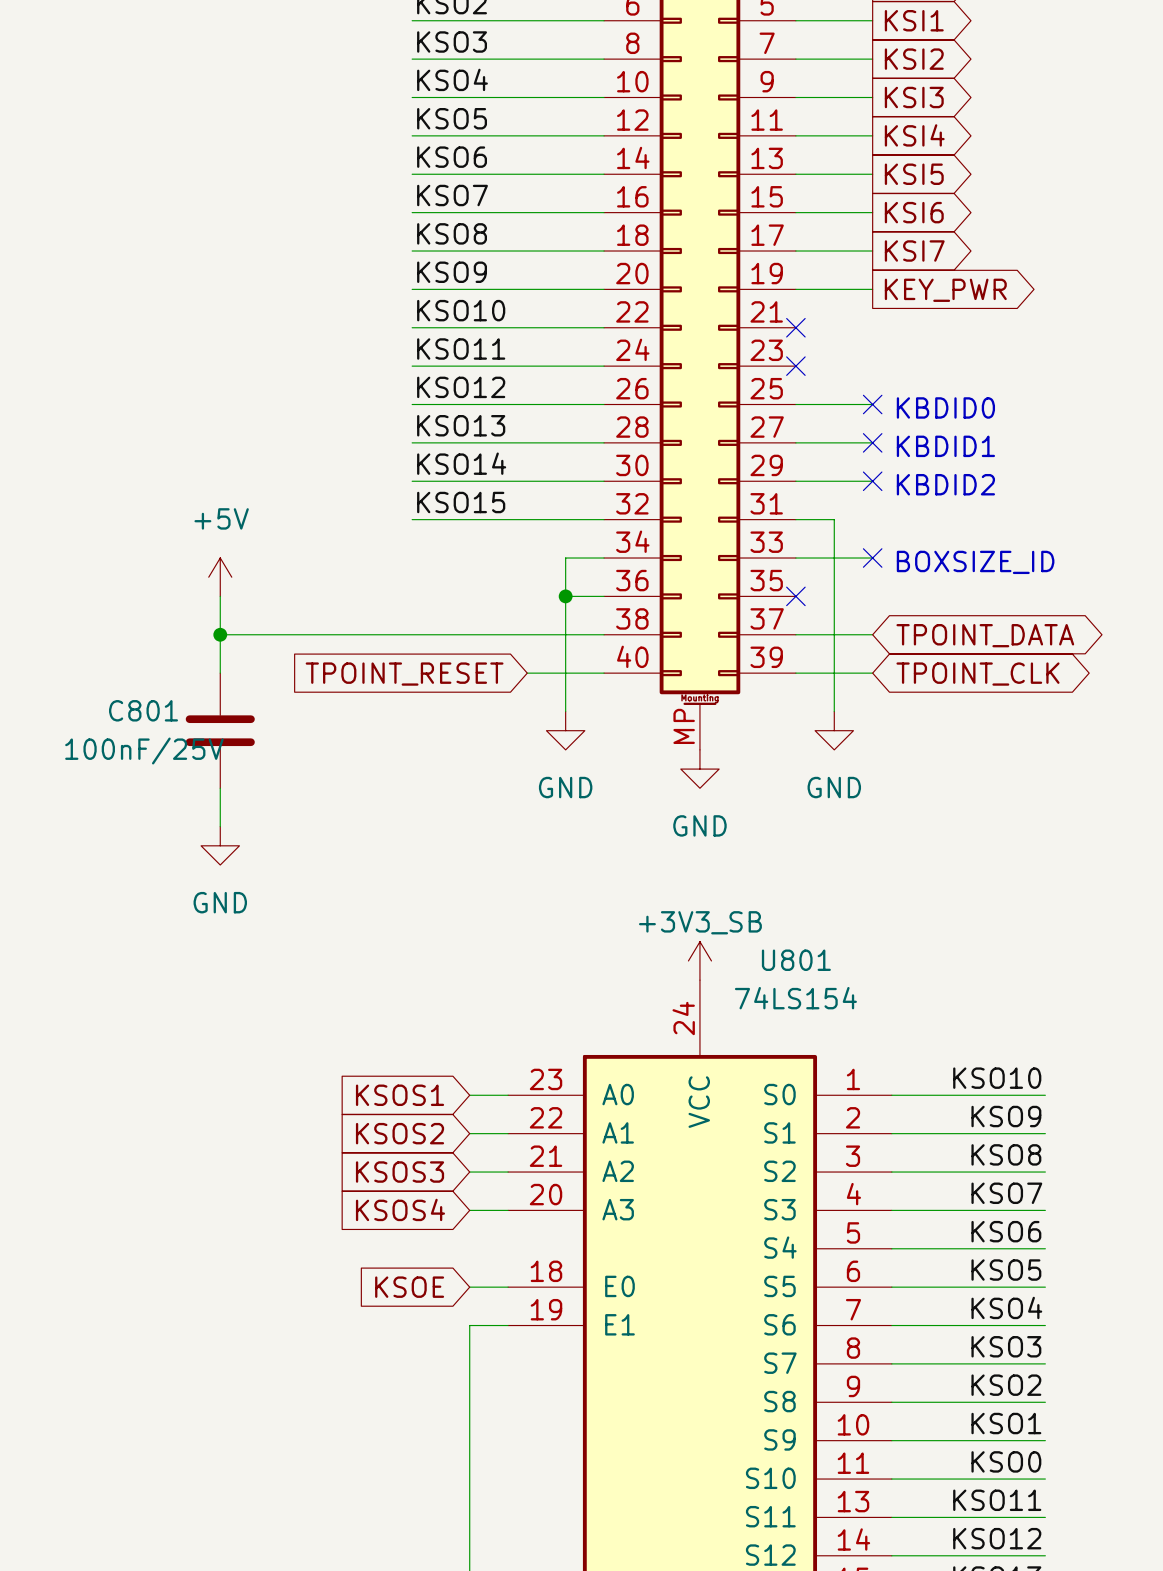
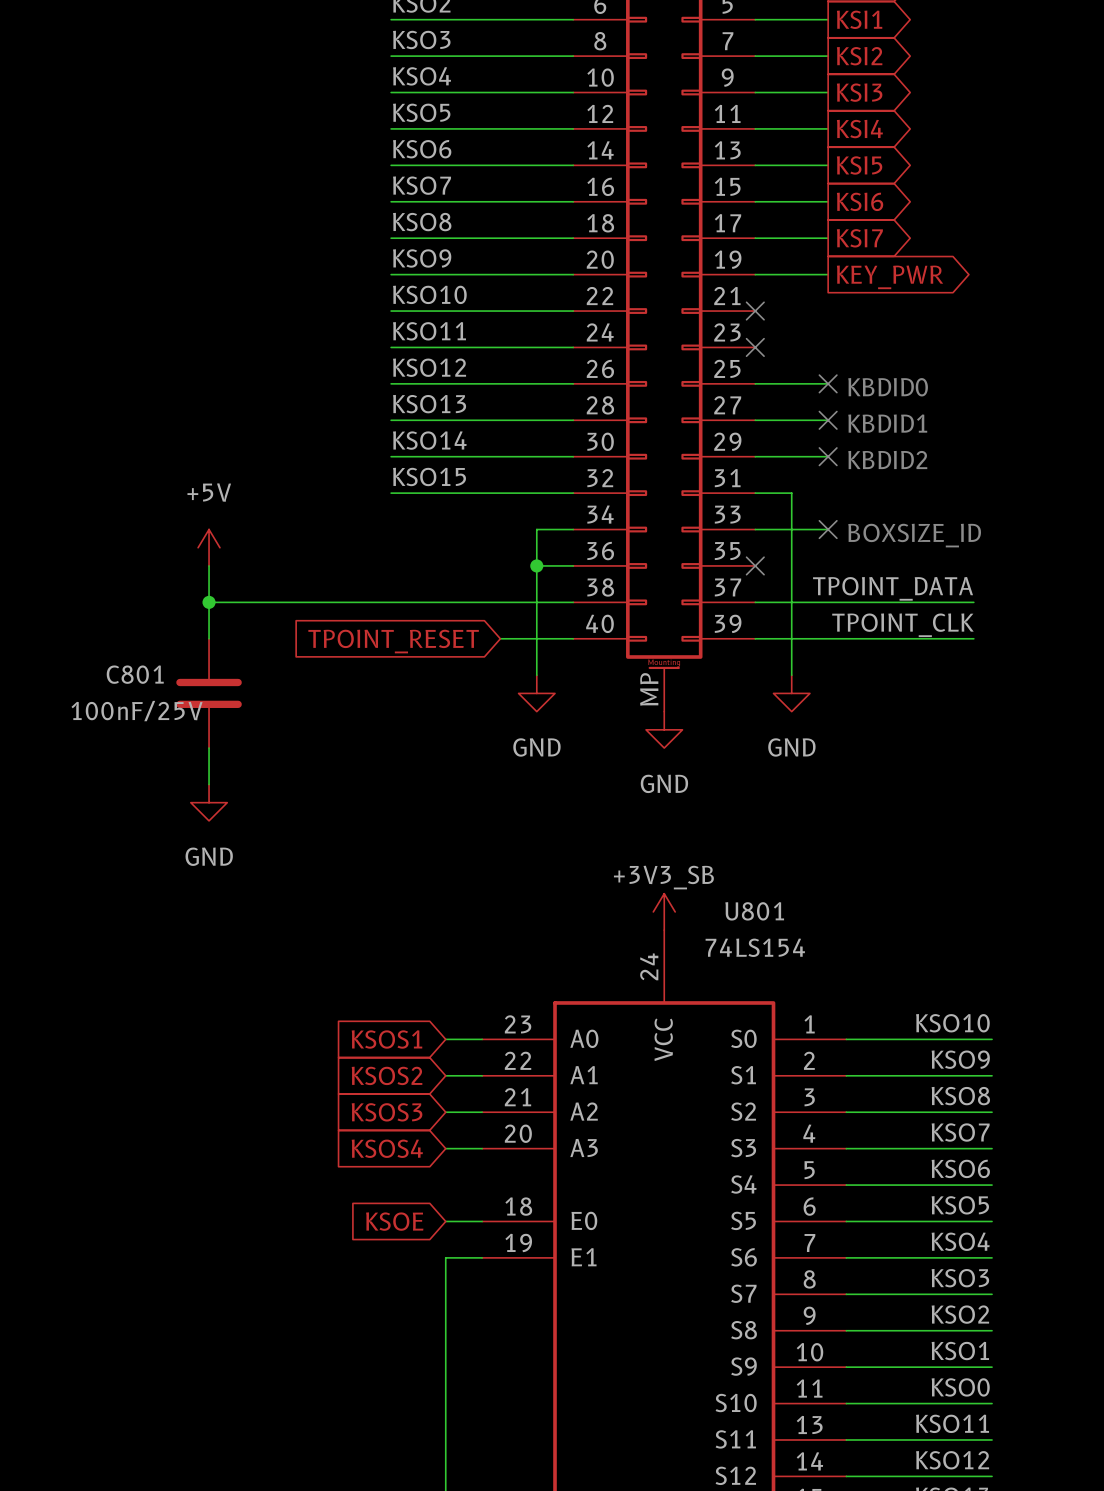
label: none -> TPOINT_DATA (893, 588)
wire: none -> (828, 602) (973, 602)
global label: TPOINT_DATA (985, 635) -> none
label: none -> TPOINT_CLK (902, 625)
wire: none -> (828, 638) (973, 638)
global label: TPOINT_CLK (978, 674) -> none

